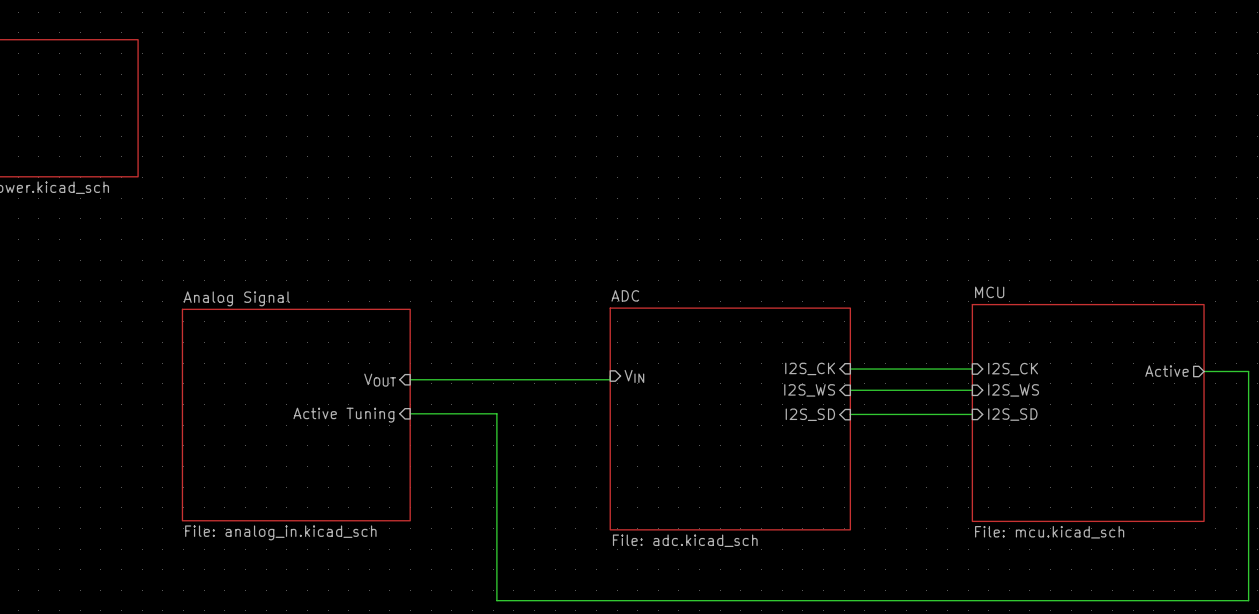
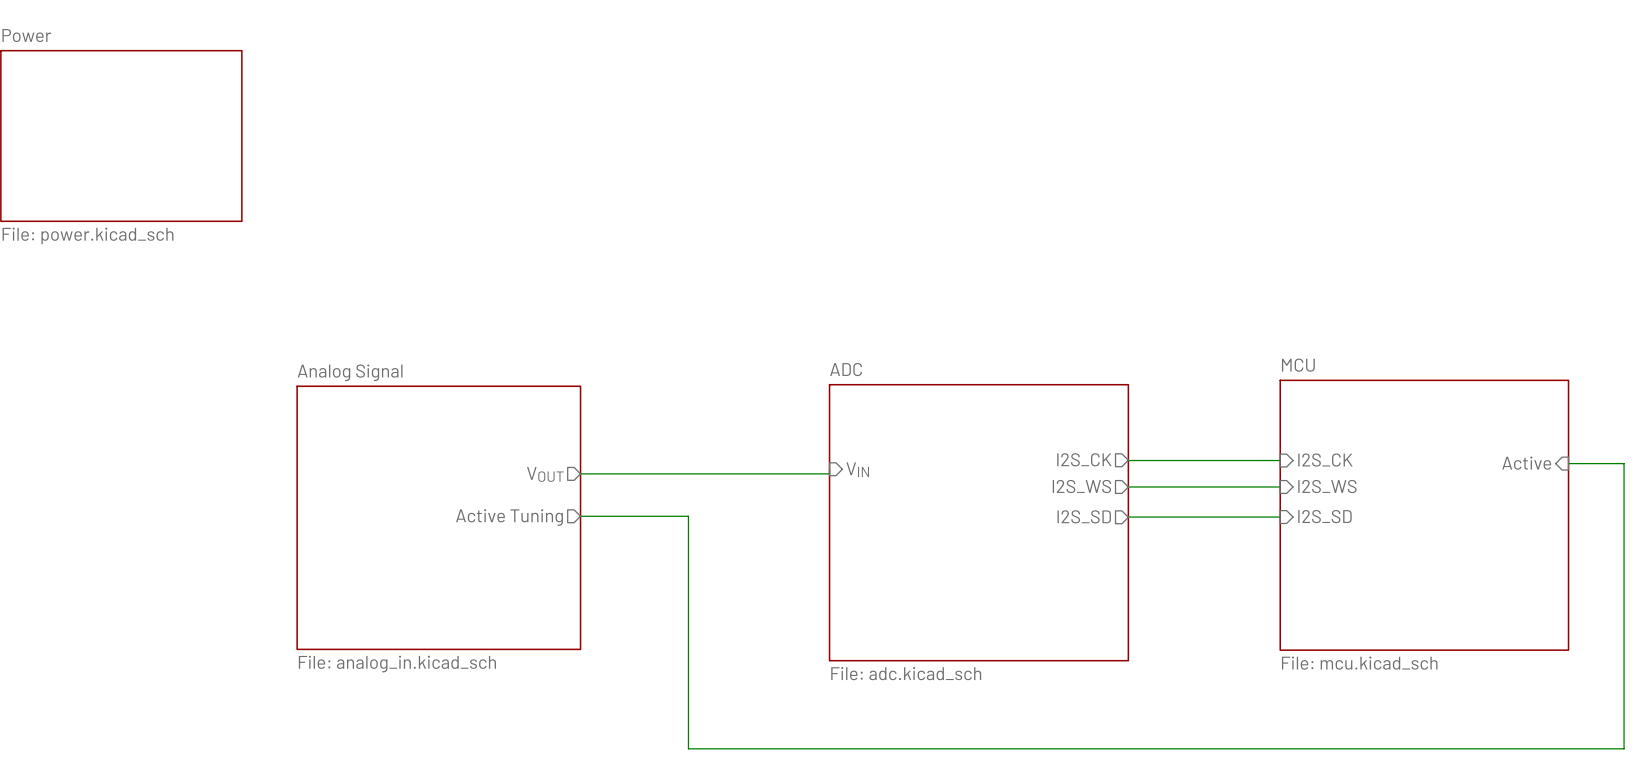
sheet pin shape: input (810, 368) -> output (1084, 459)
sheet pin shape: output (1166, 371) -> input (1526, 463)
sheet pin shape: input (380, 380) -> output (545, 474)
sheet pin shape: input (809, 390) -> output (1081, 486)
sheet pin shape: input (810, 414) -> output (1084, 516)
sheet pin shape: input (343, 415) -> output (509, 517)

